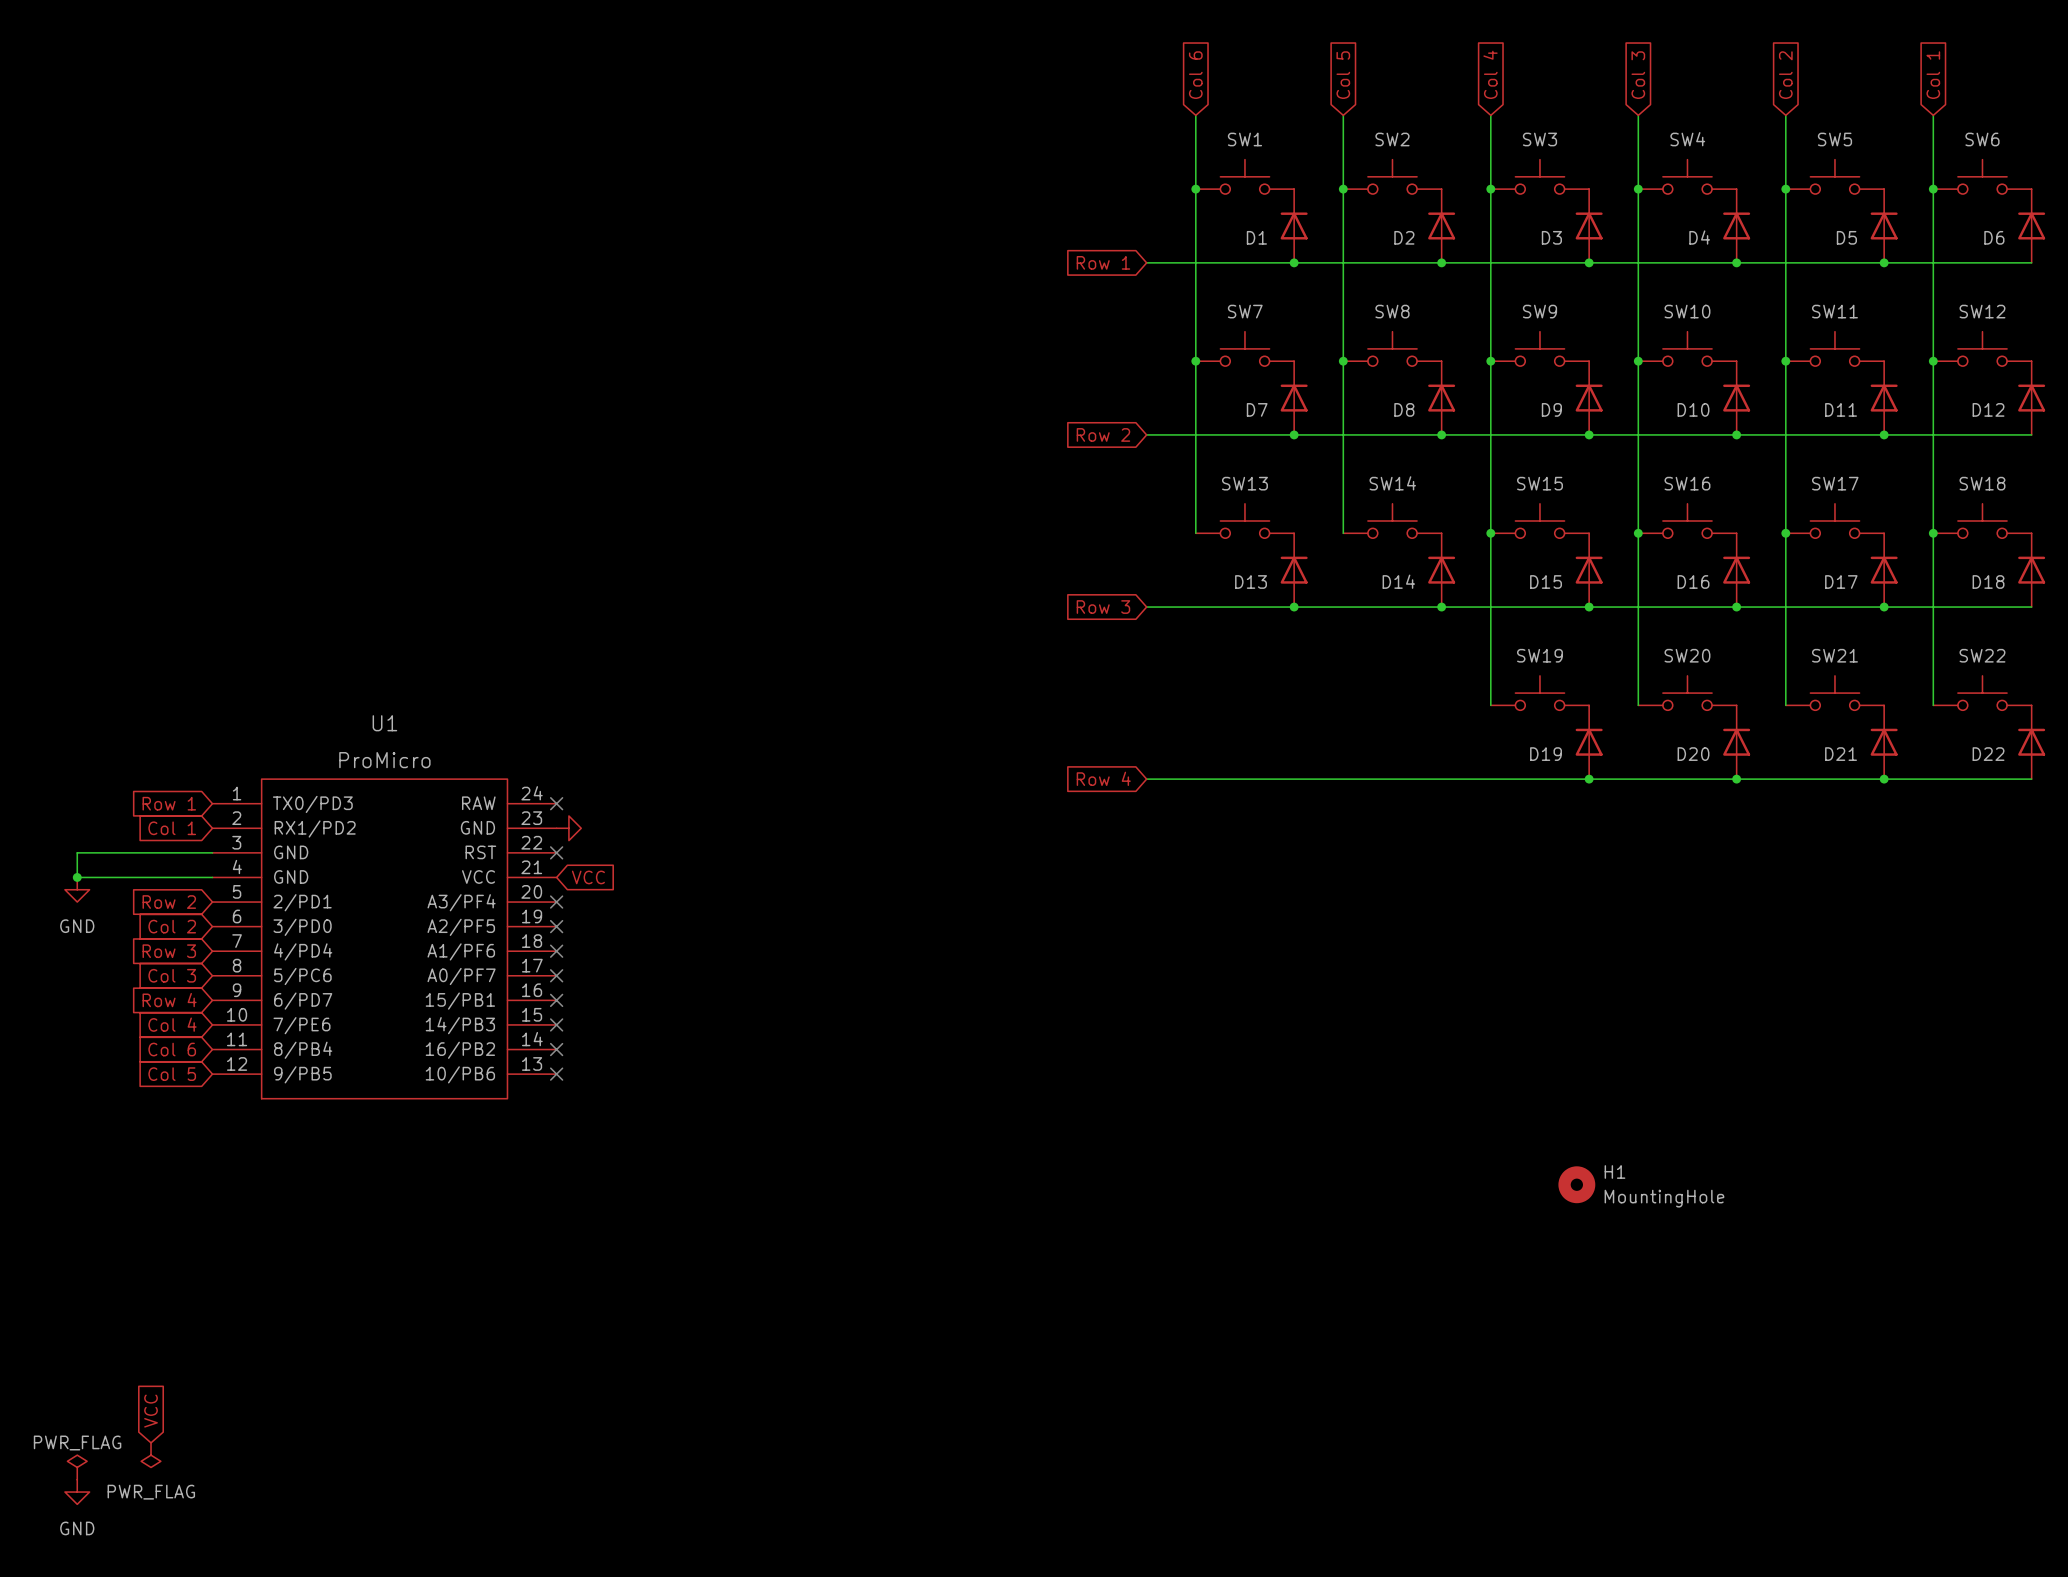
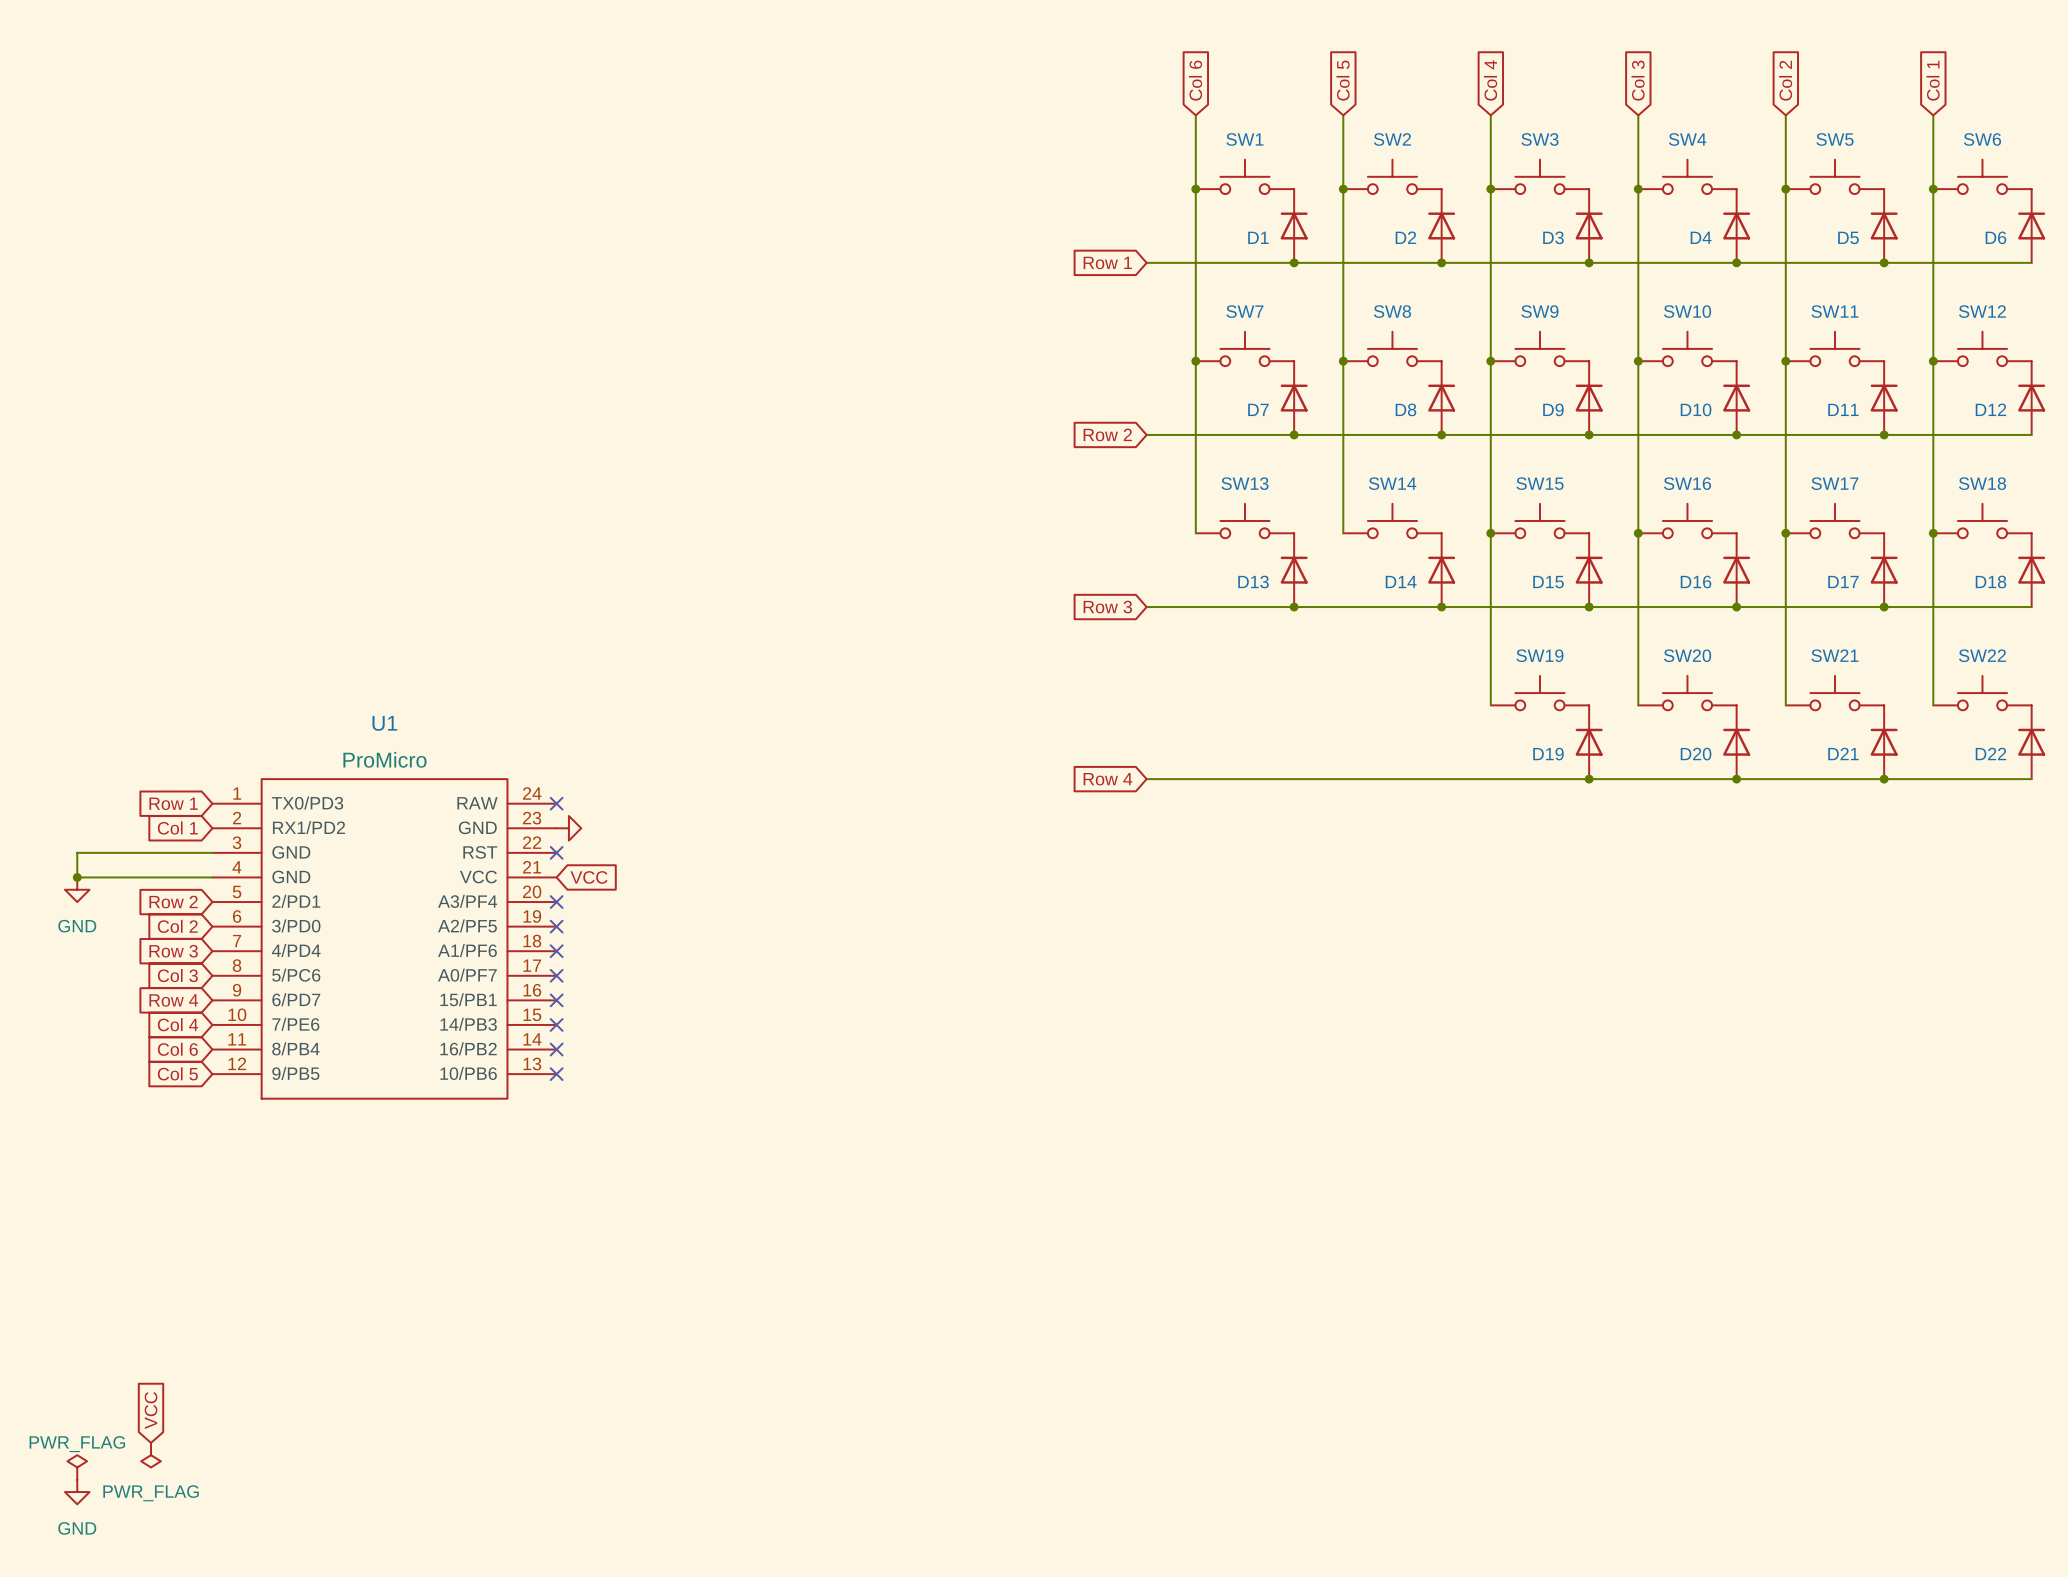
H1: MountingHole (1576, 1184) -> none

